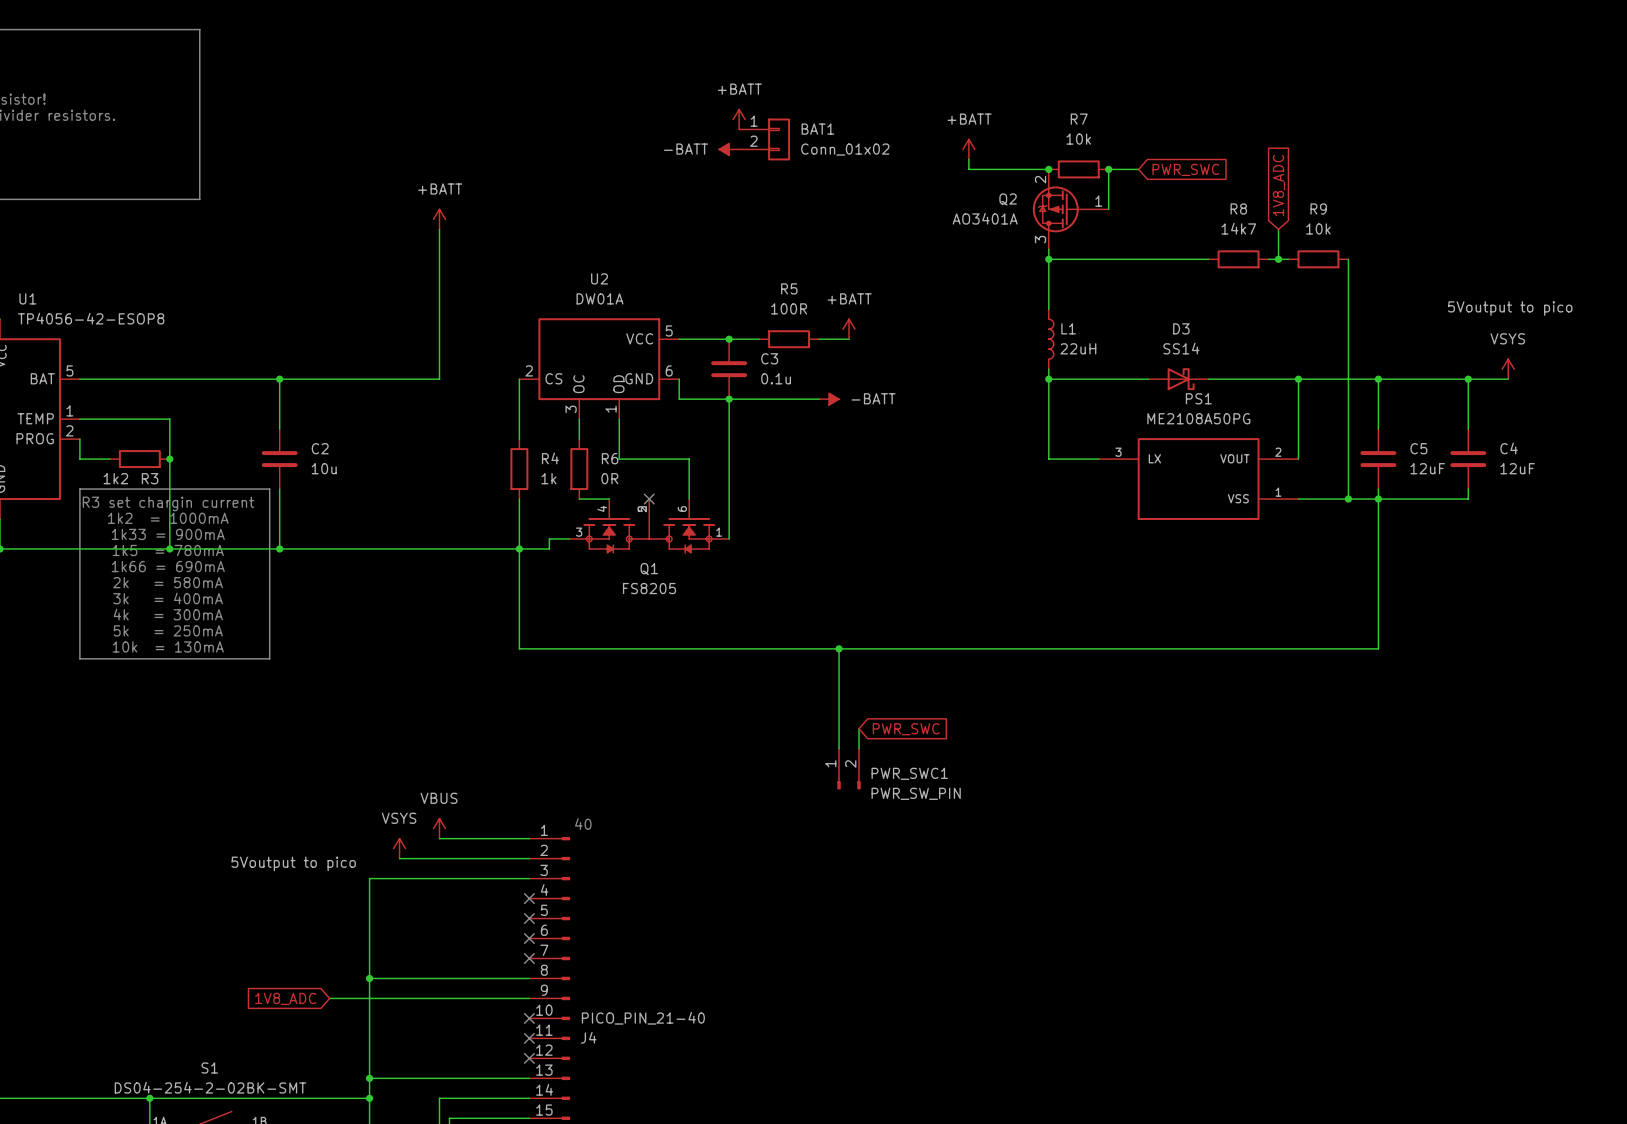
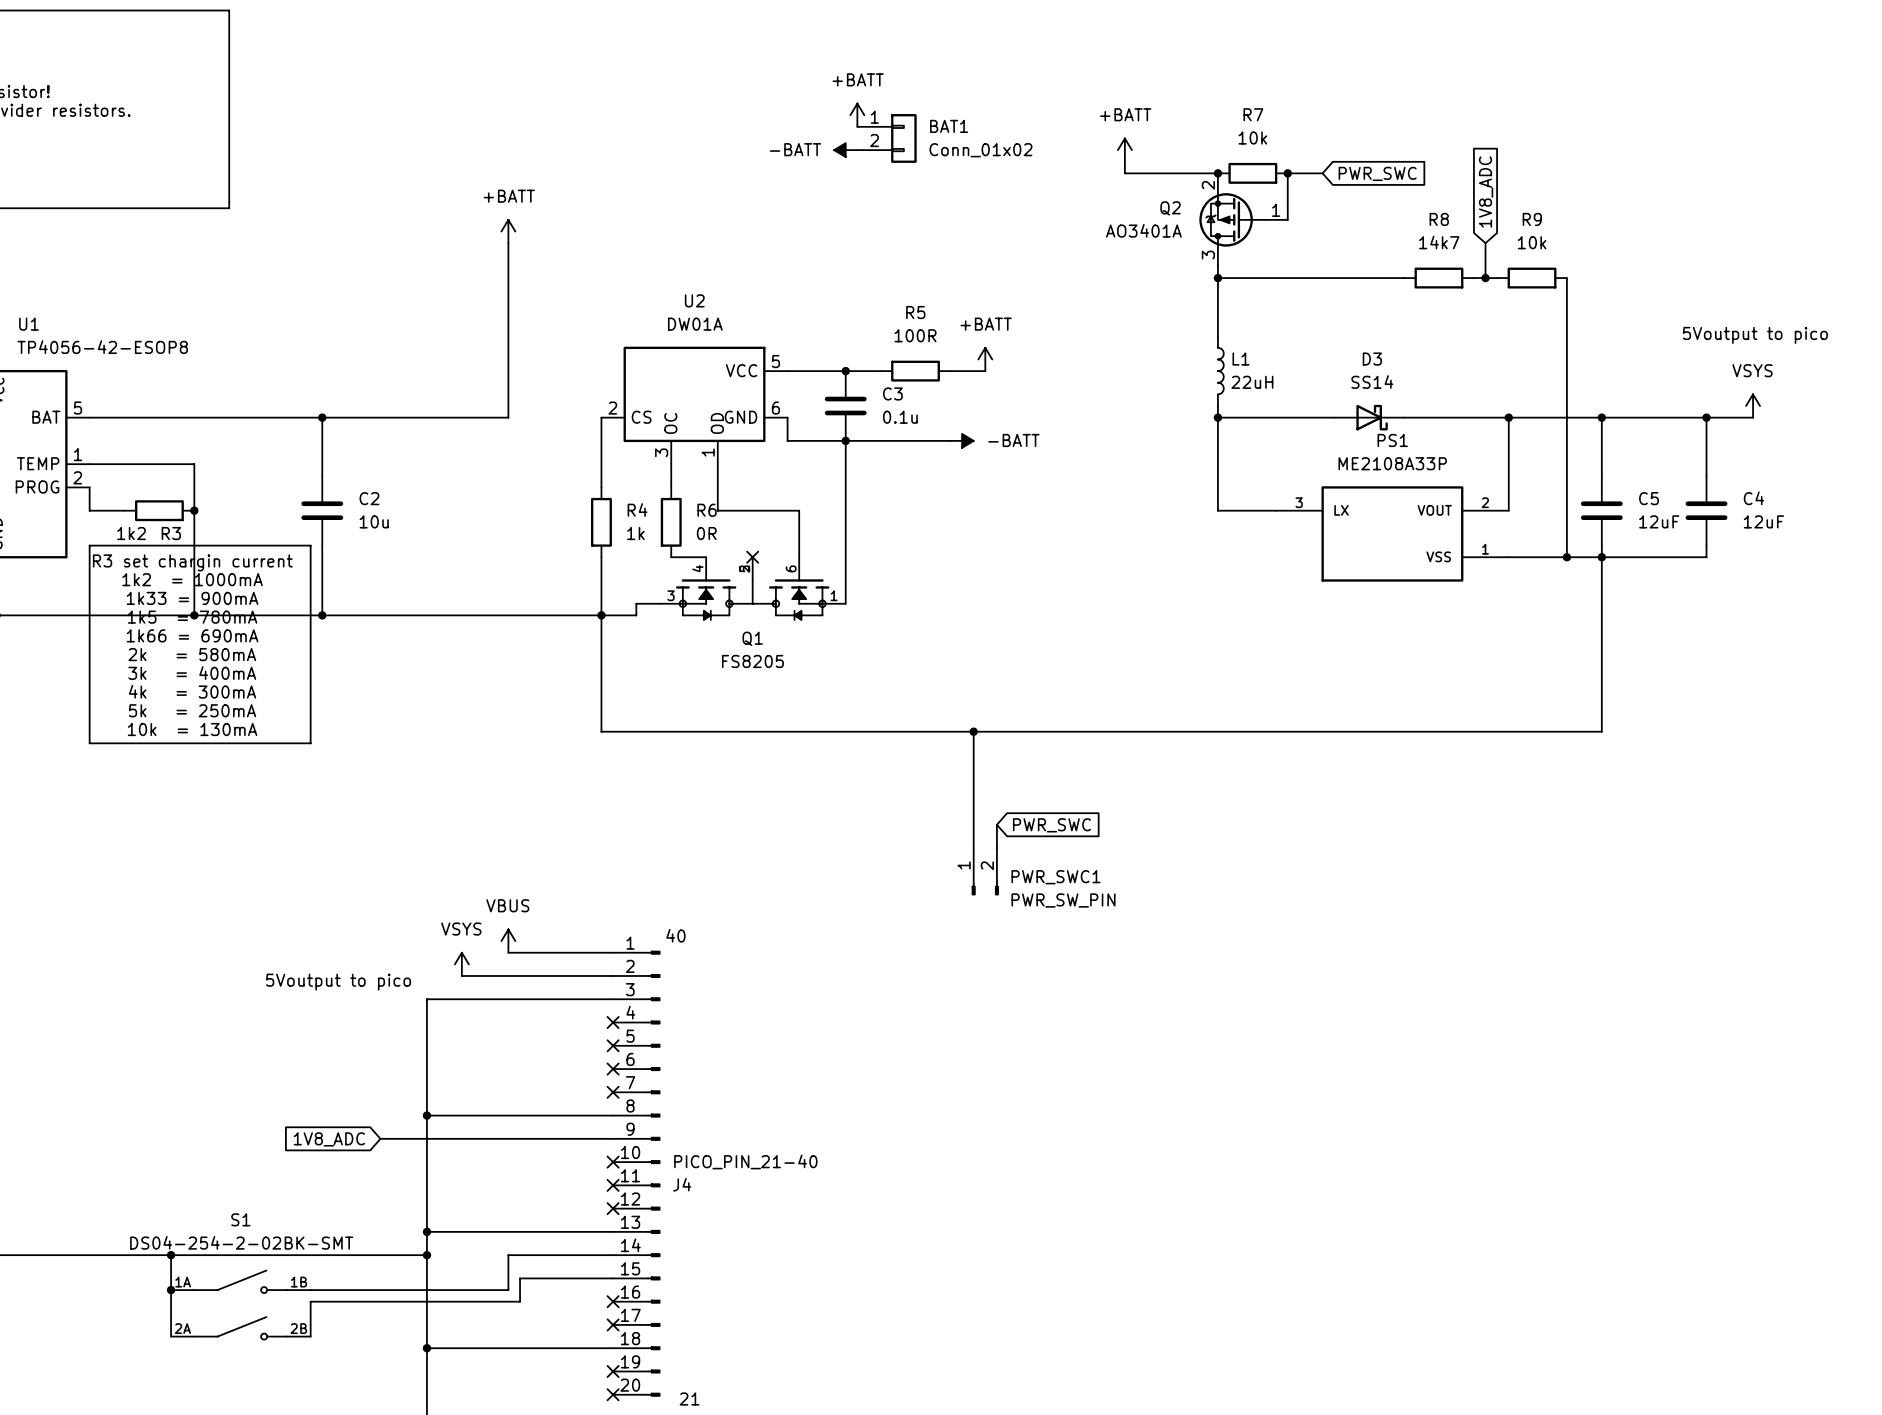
PS1 value: ME2108A50PG (1198, 418) -> ME2108A33P (1392, 463)

